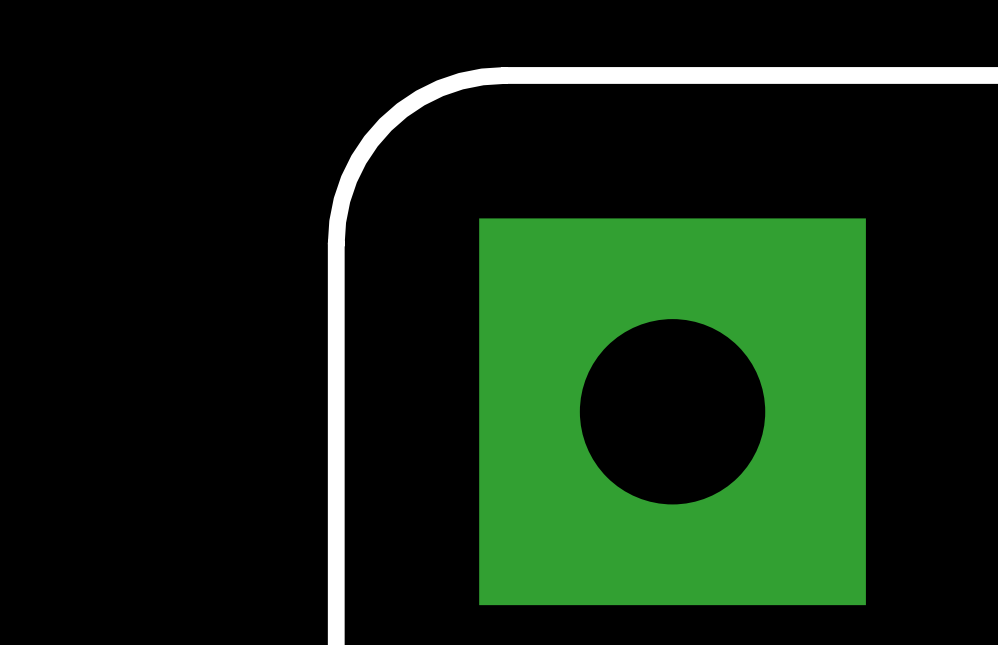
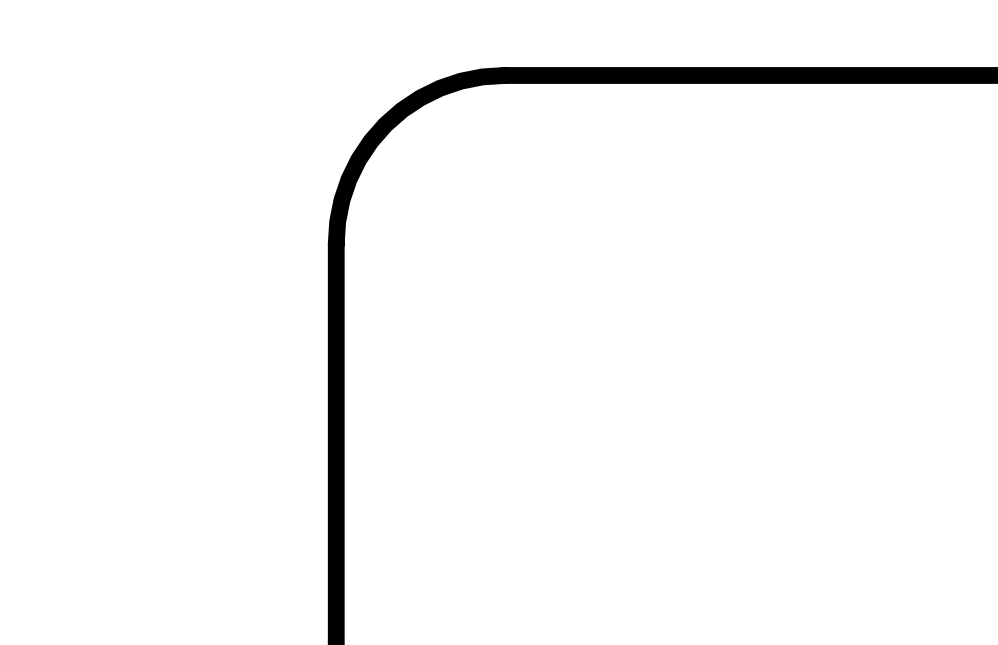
part: (672, 411) -> none

